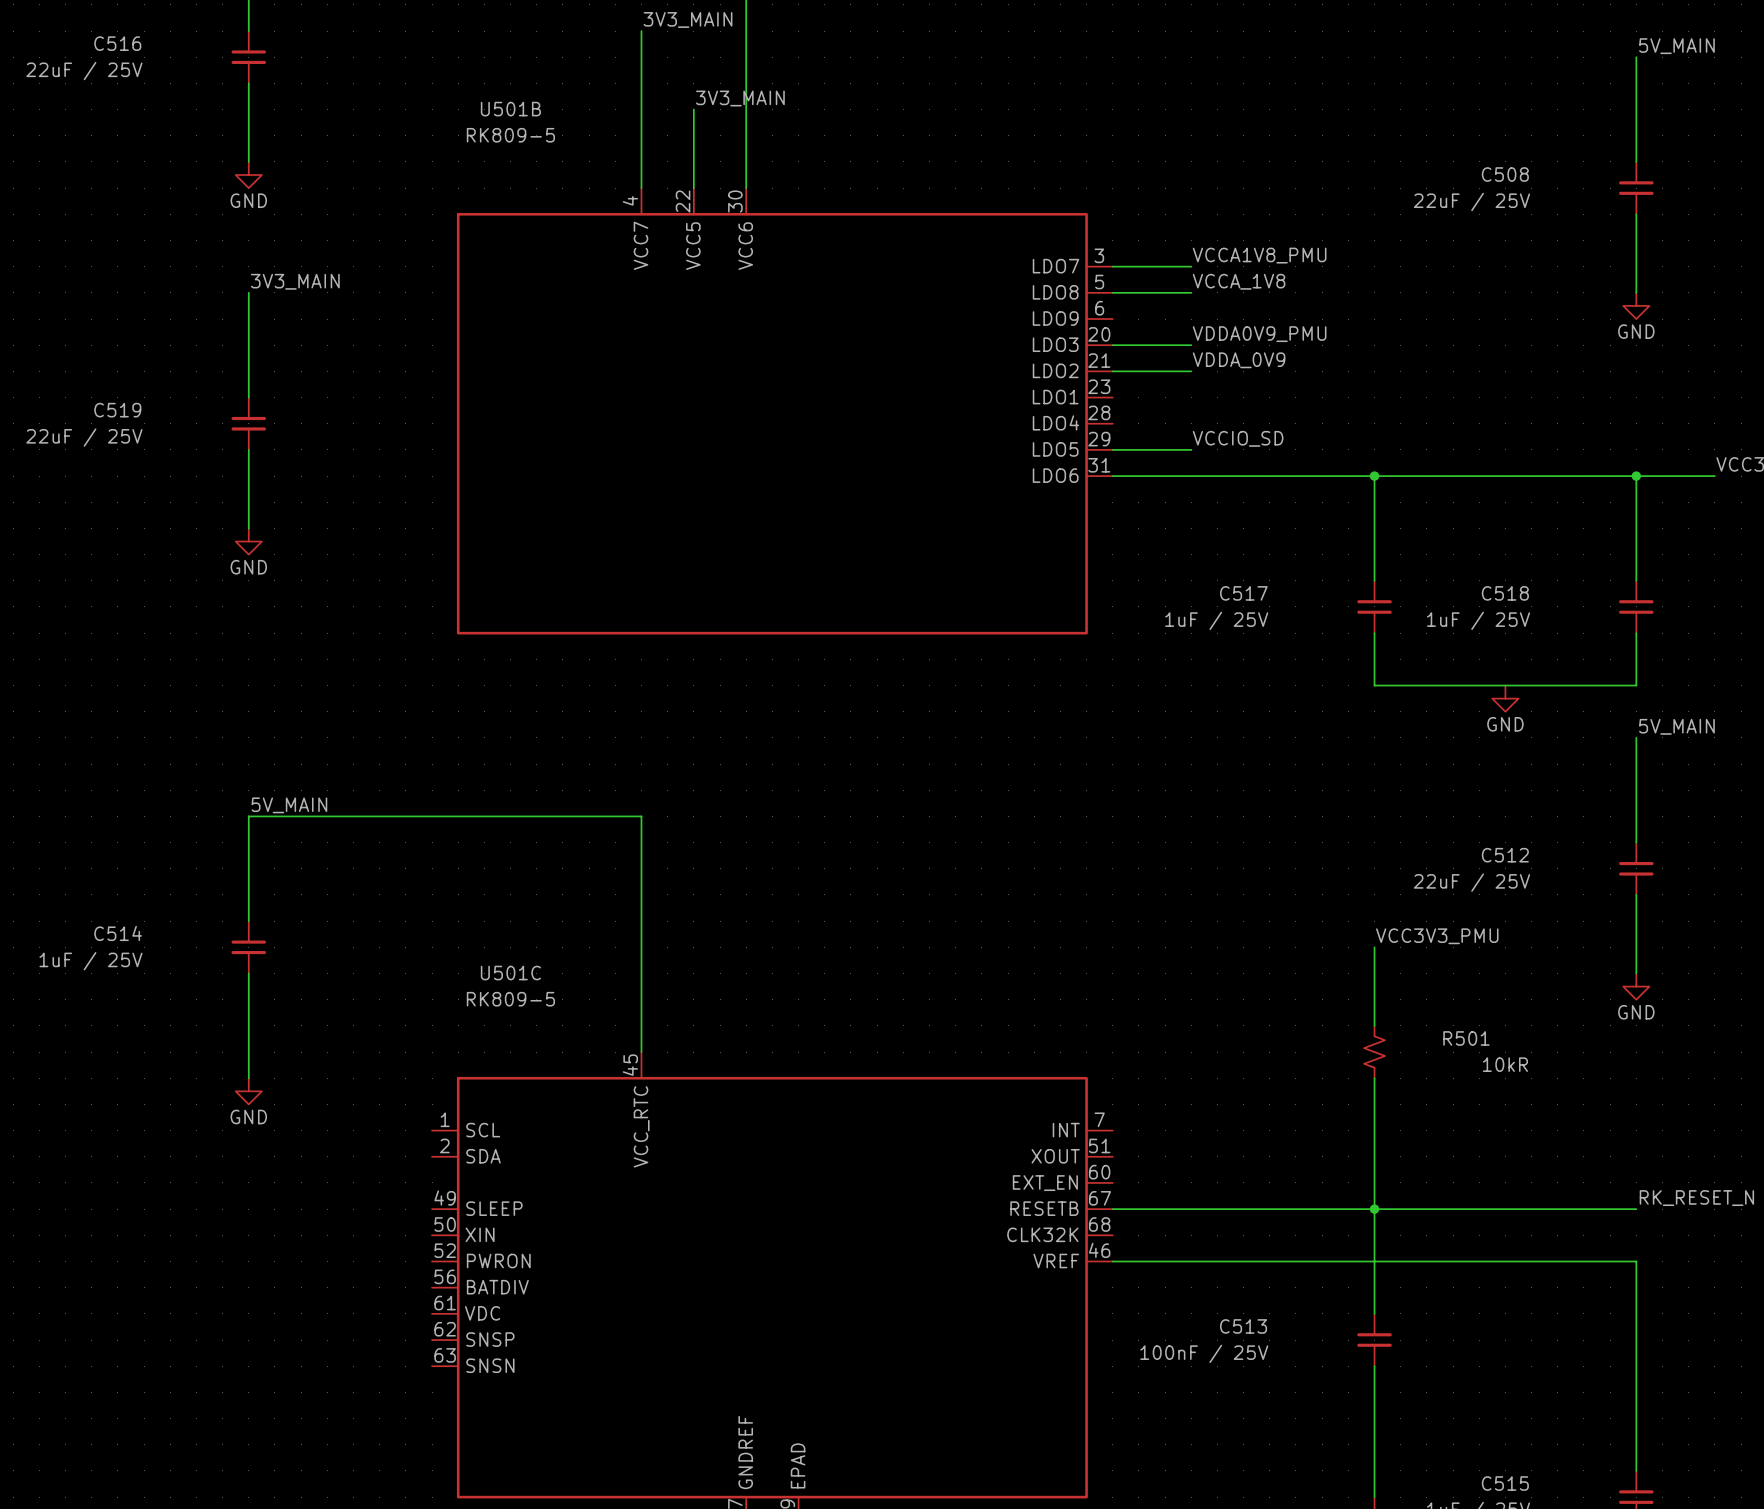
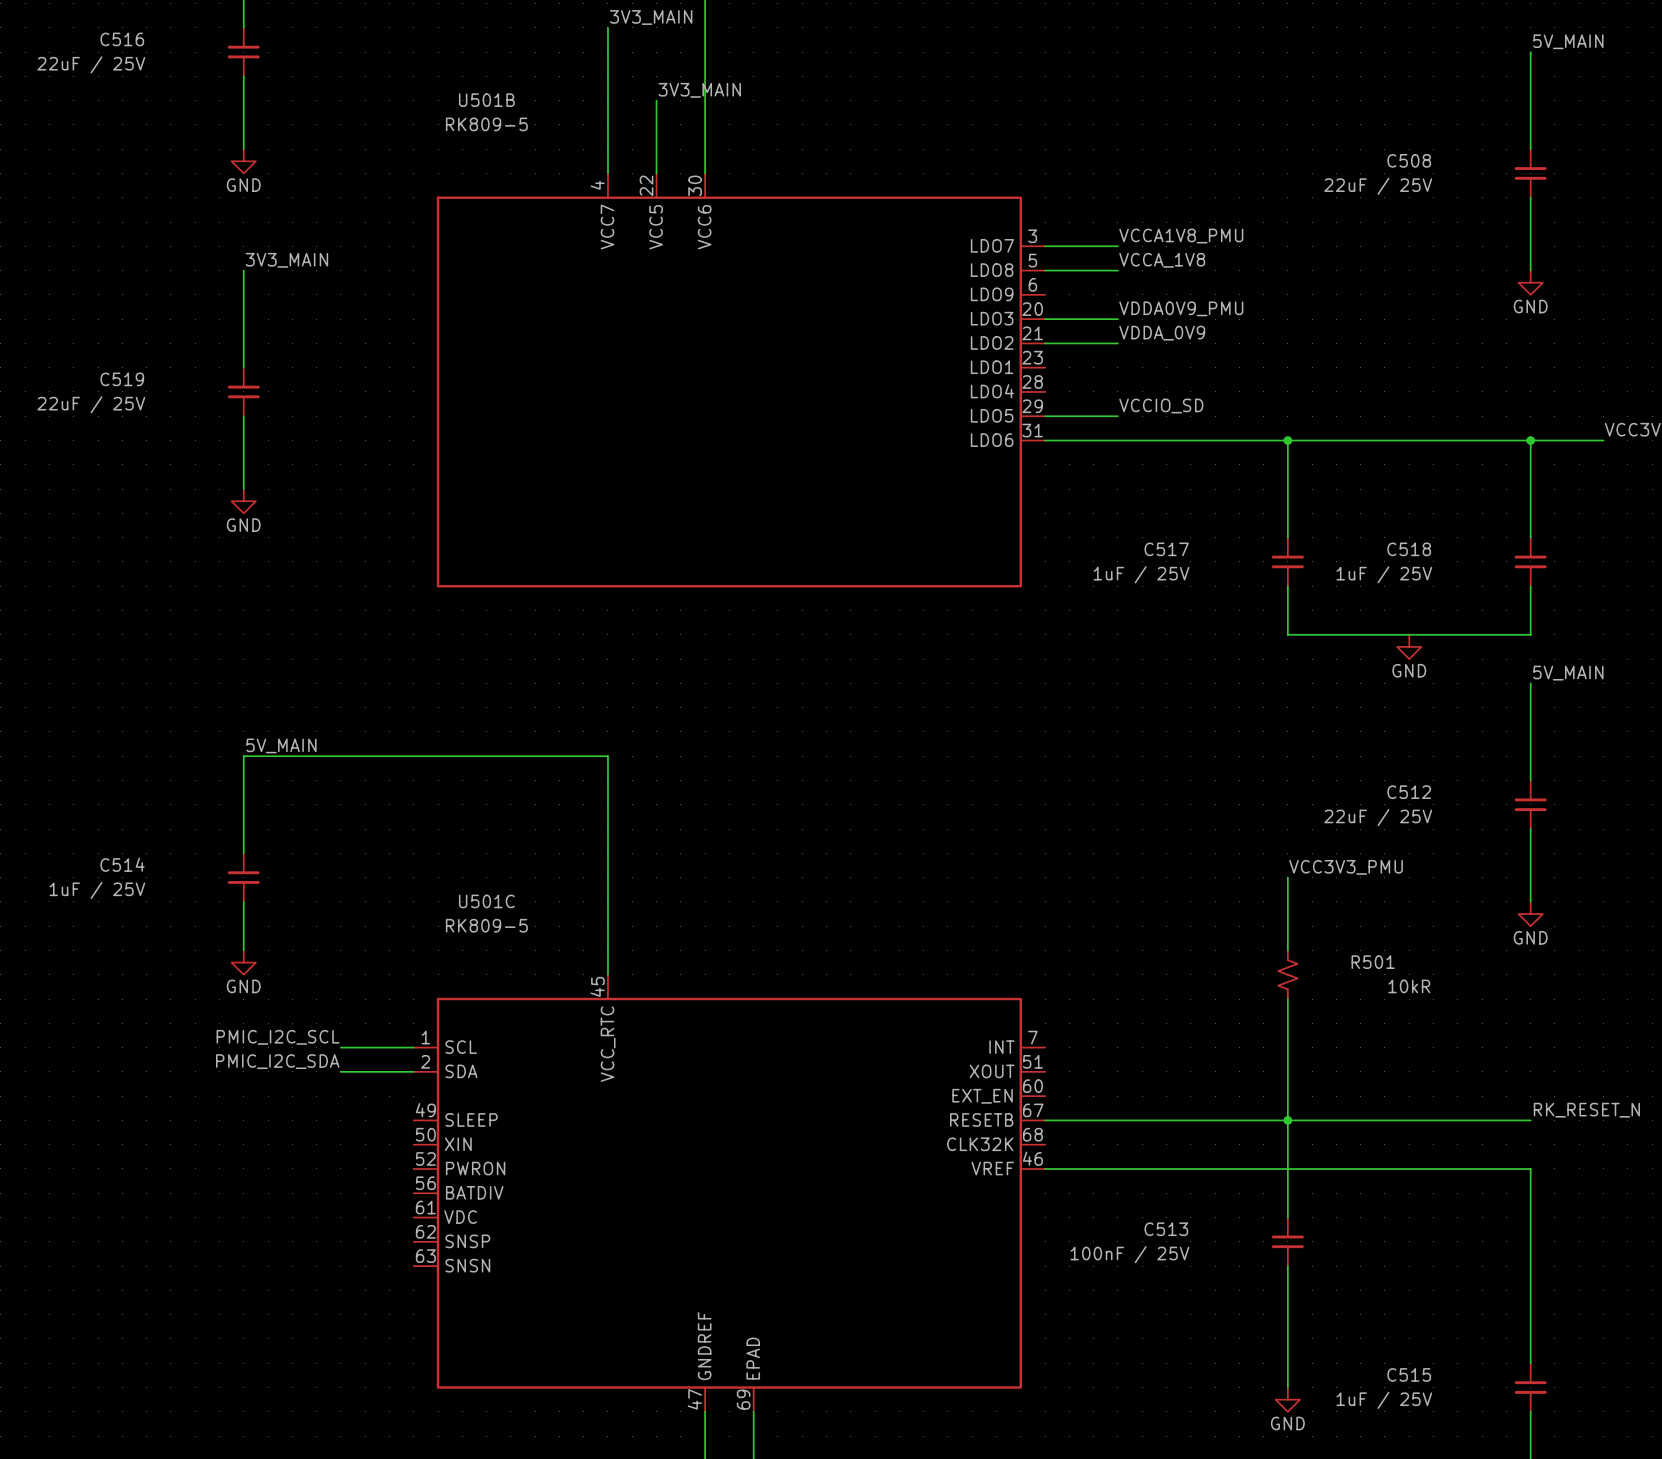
wire: (248, 1025) (248, 1078) -> none
power symbol position: GND (248, 1091) -> GND (243, 962)
label: none -> PMIC_I2C_SCL (278, 1037)
wire: none -> (340, 1047) (413, 1047)
label: none -> PMIC_I2C_SDA (277, 1061)
wire: none -> (340, 1071) (413, 1071)

